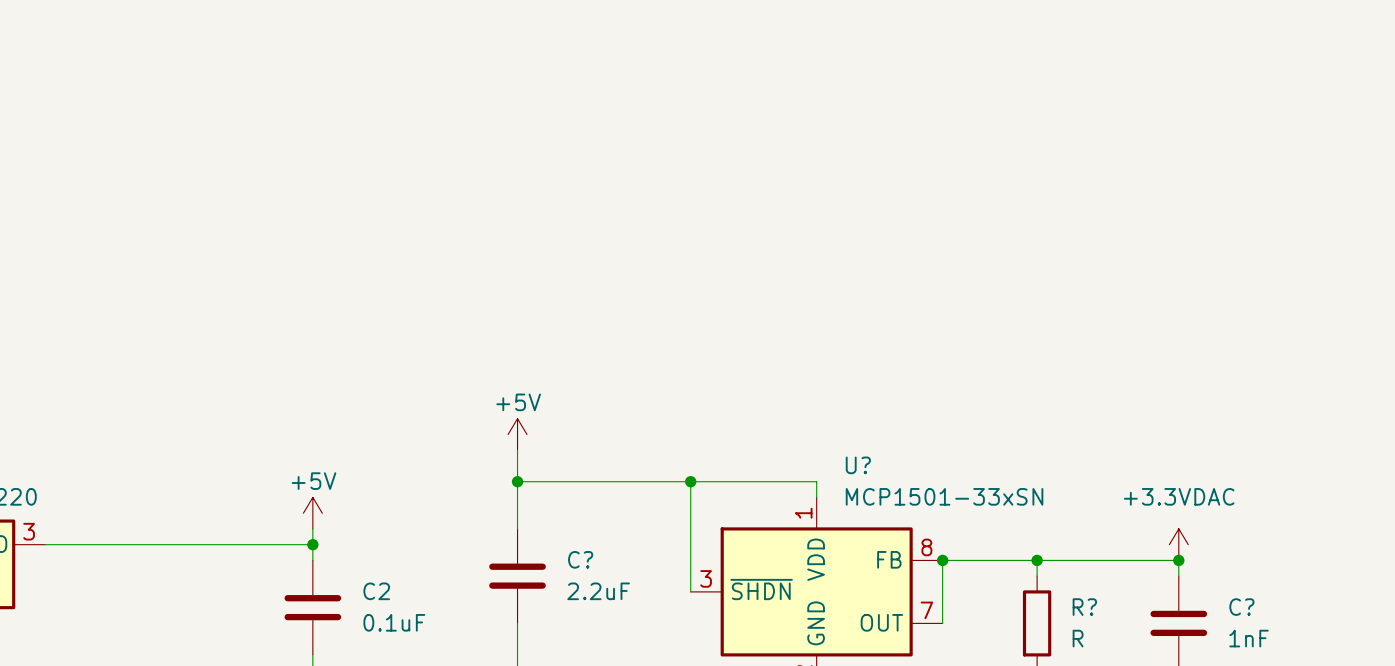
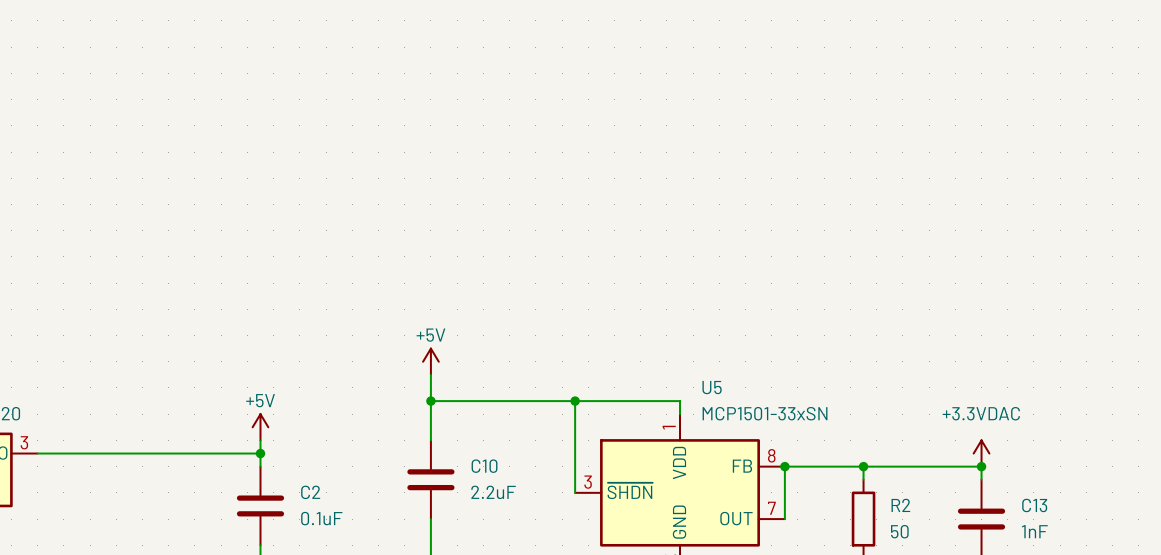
U? name: U? (858, 465) -> U5 (712, 387)
C? name: C? (580, 559) -> C10 (484, 466)
R? name: R? (1084, 607) -> R2 (900, 505)
C? name: C? (1241, 607) -> C13 (1034, 505)
R? value: R (1078, 638) -> 50 (899, 531)

